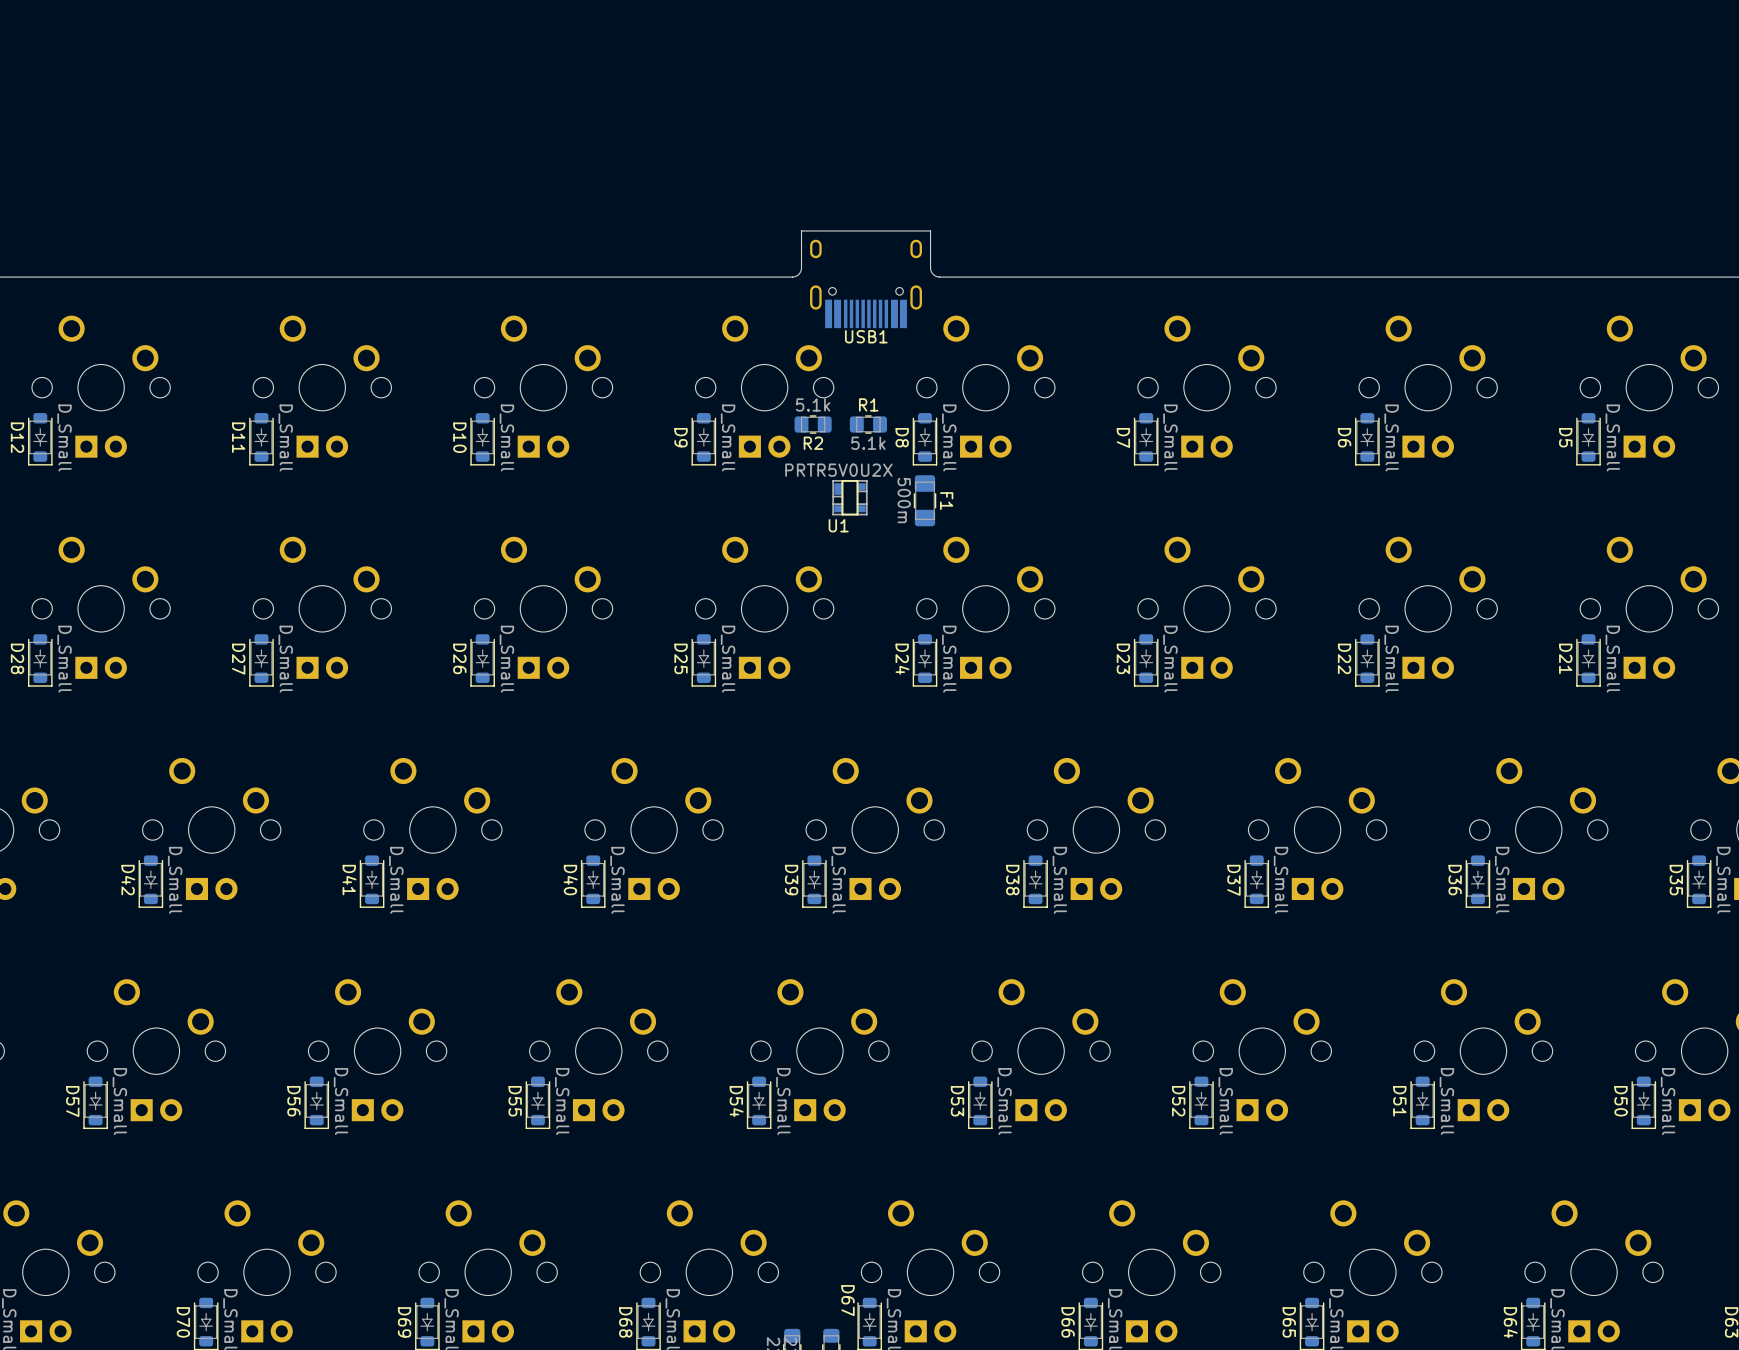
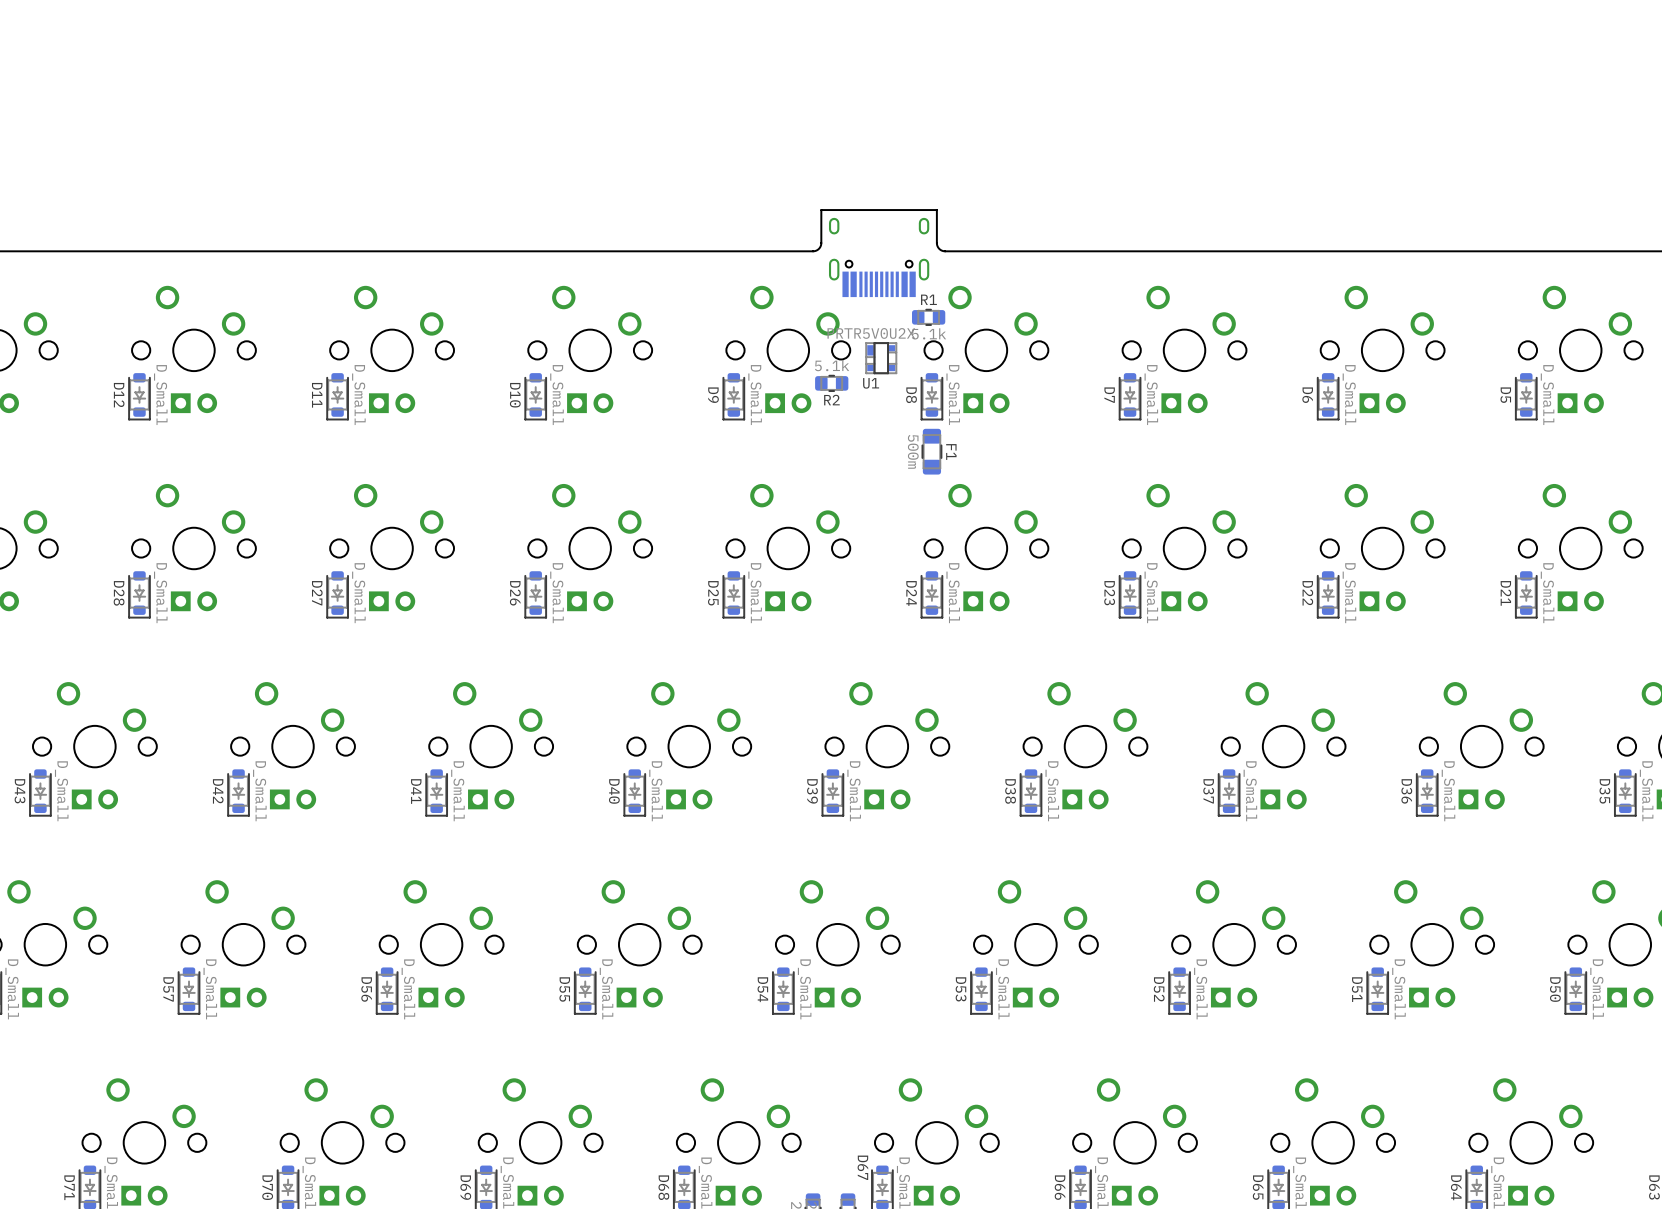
USB1 name: USB1 (866, 336) -> none
R1 position: (868, 424) -> (928, 317)
U1 position: (849, 497) -> (881, 358)

